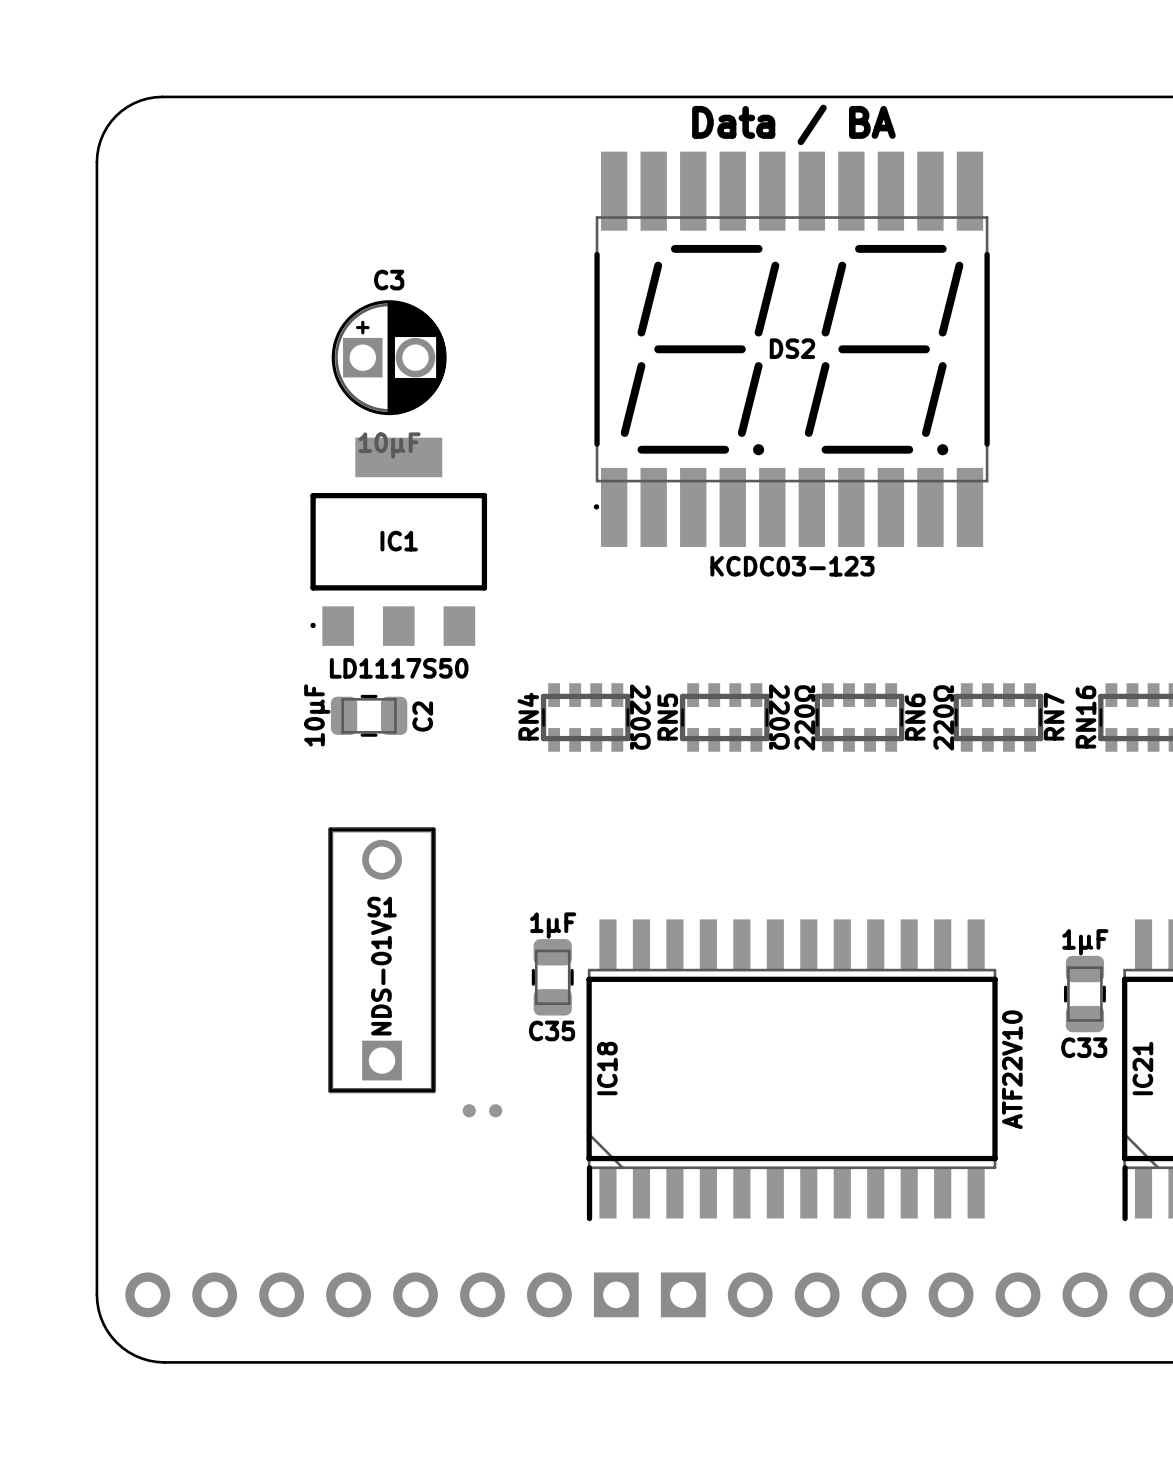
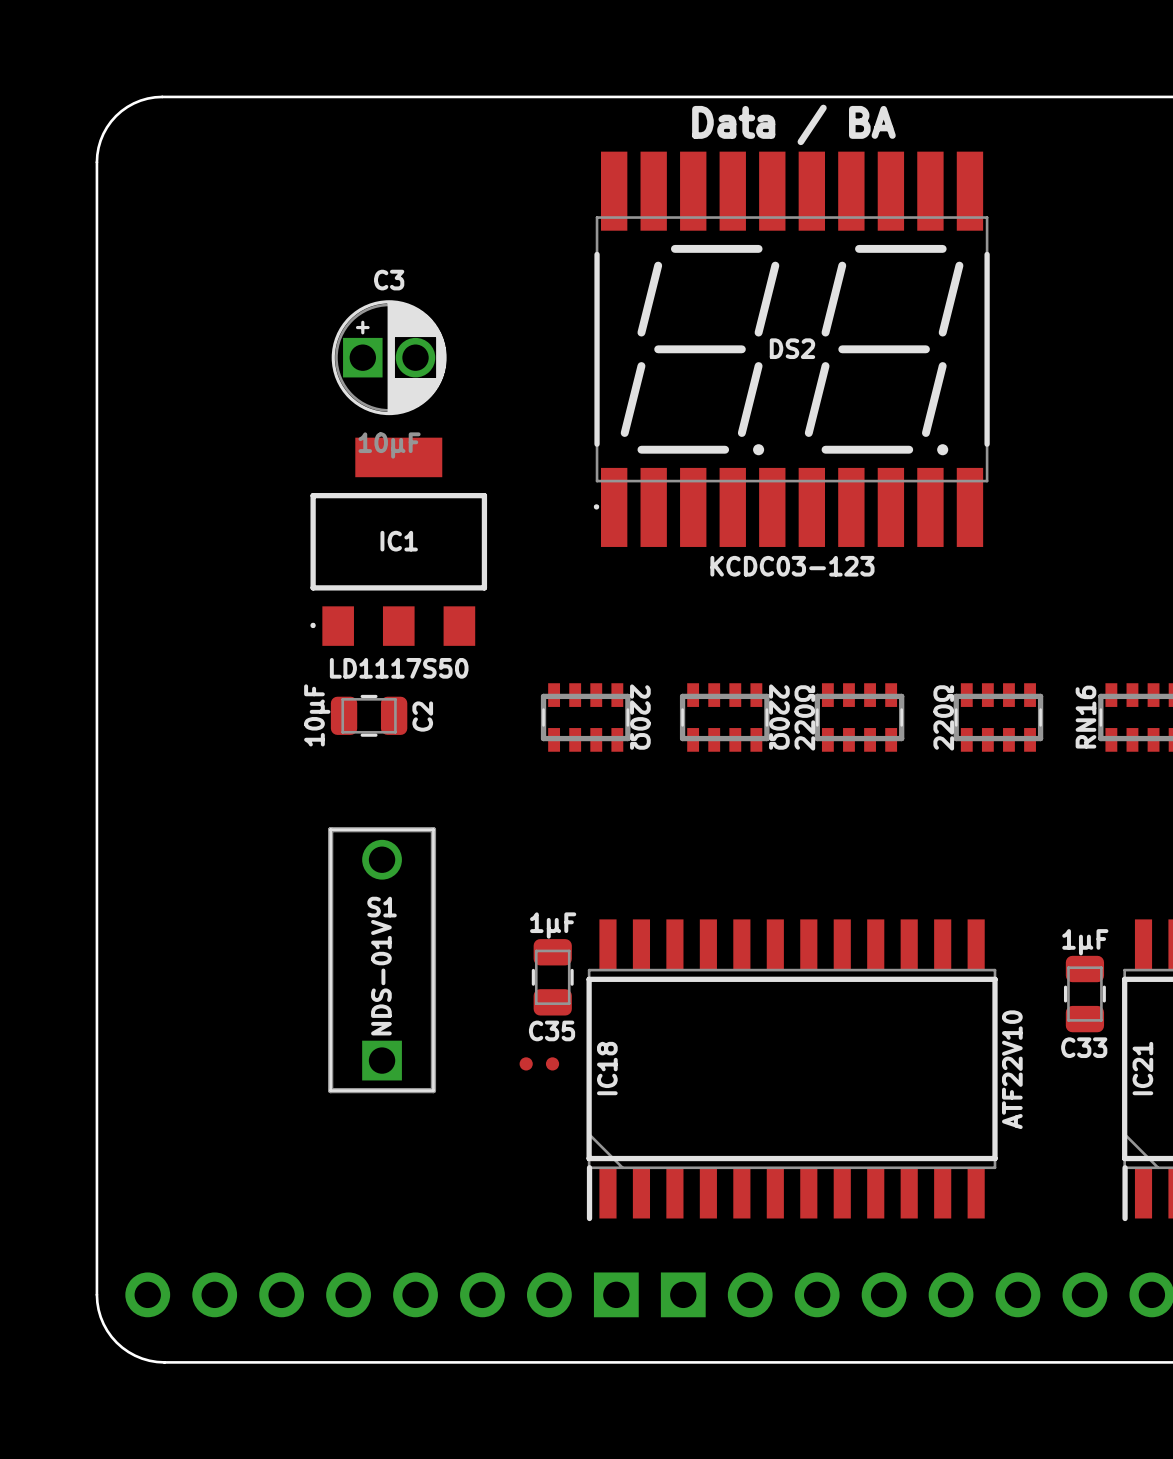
RN4 name: RN4 (528, 716) -> none
RN7 name: RN7 (1054, 716) -> none
RN5 name: RN5 (667, 717) -> none
RN6 name: RN6 (915, 717) -> none
part position: (482, 1110) -> (539, 1063)

